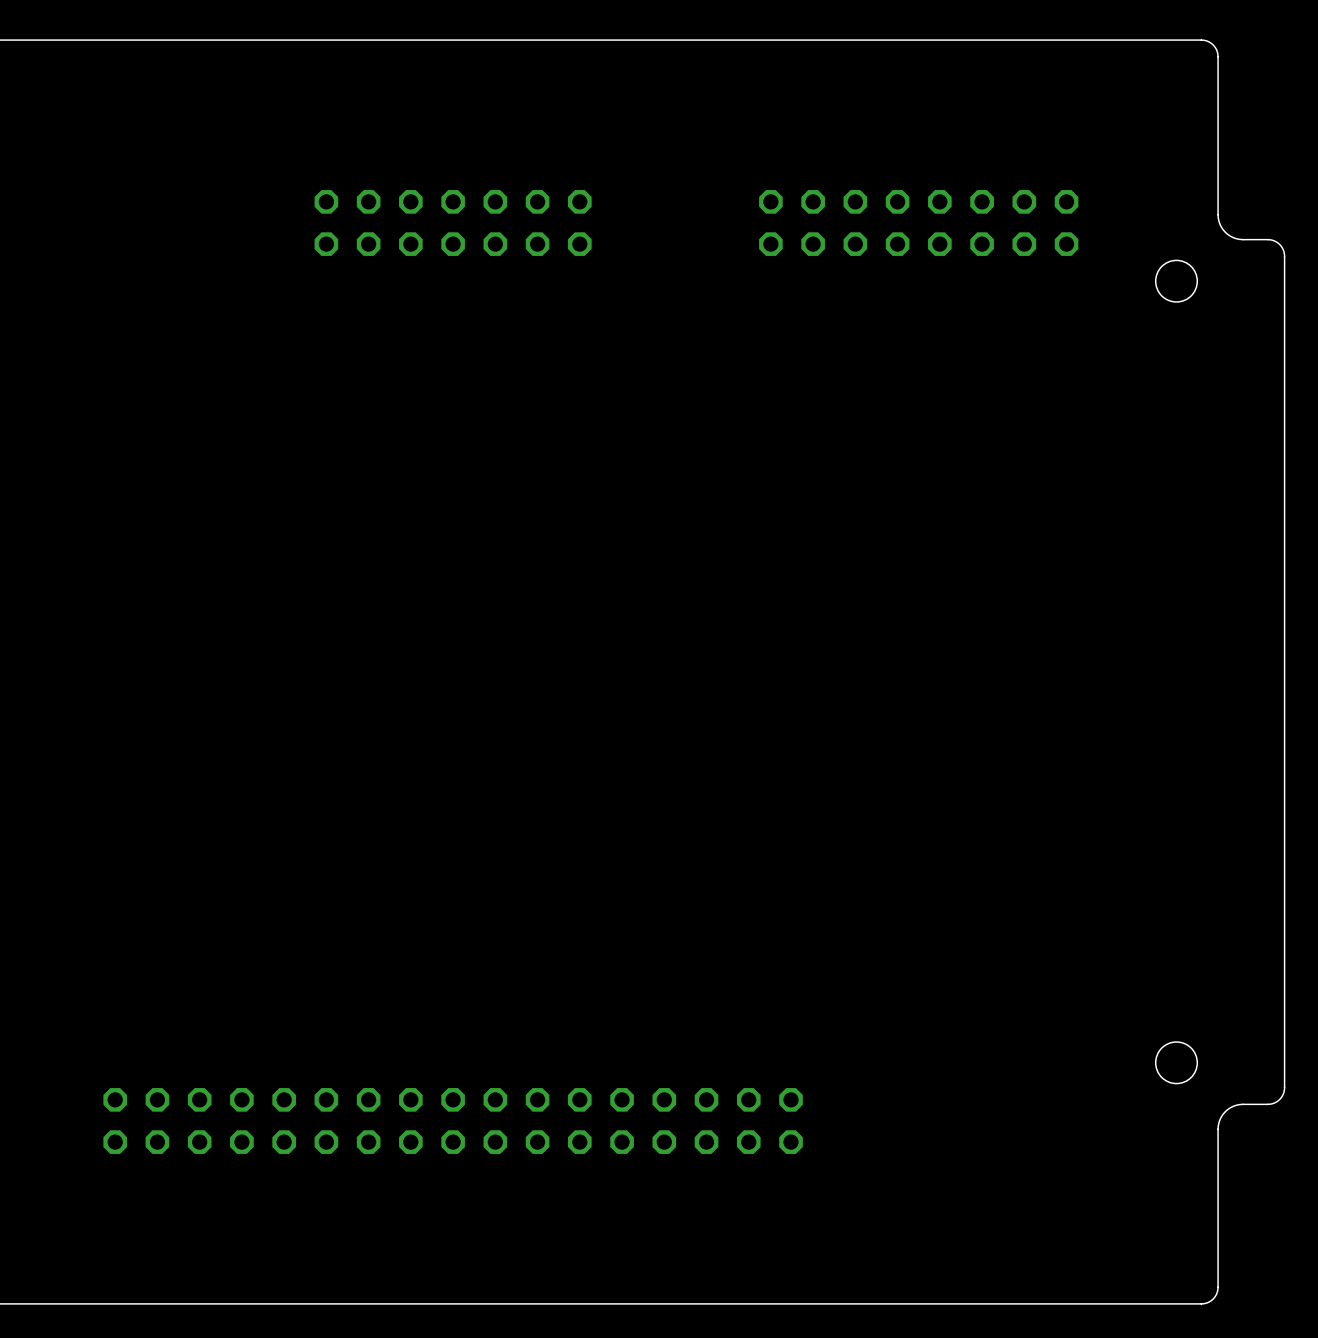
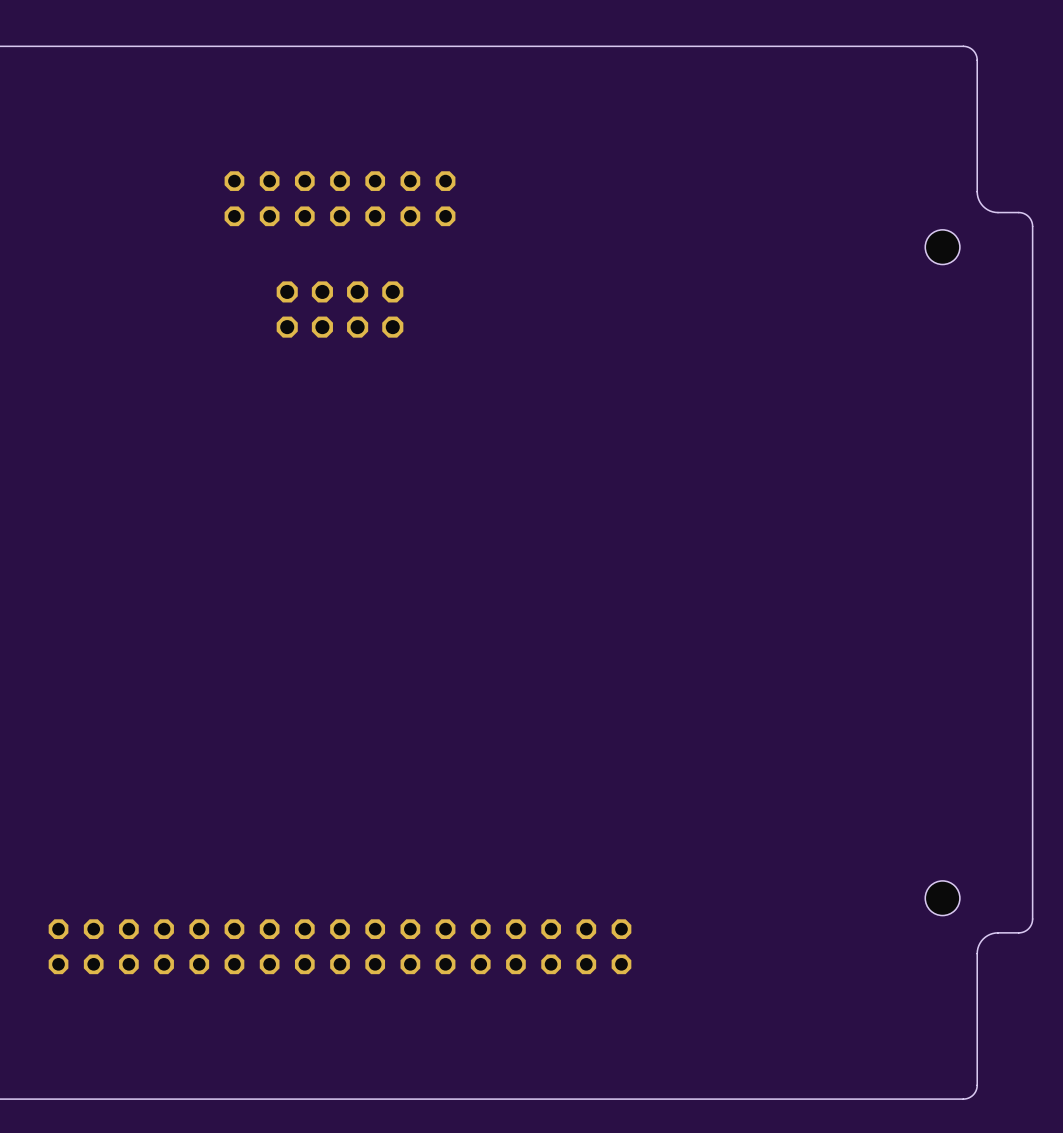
part: (918, 222) -> none
part: none -> (340, 309)

